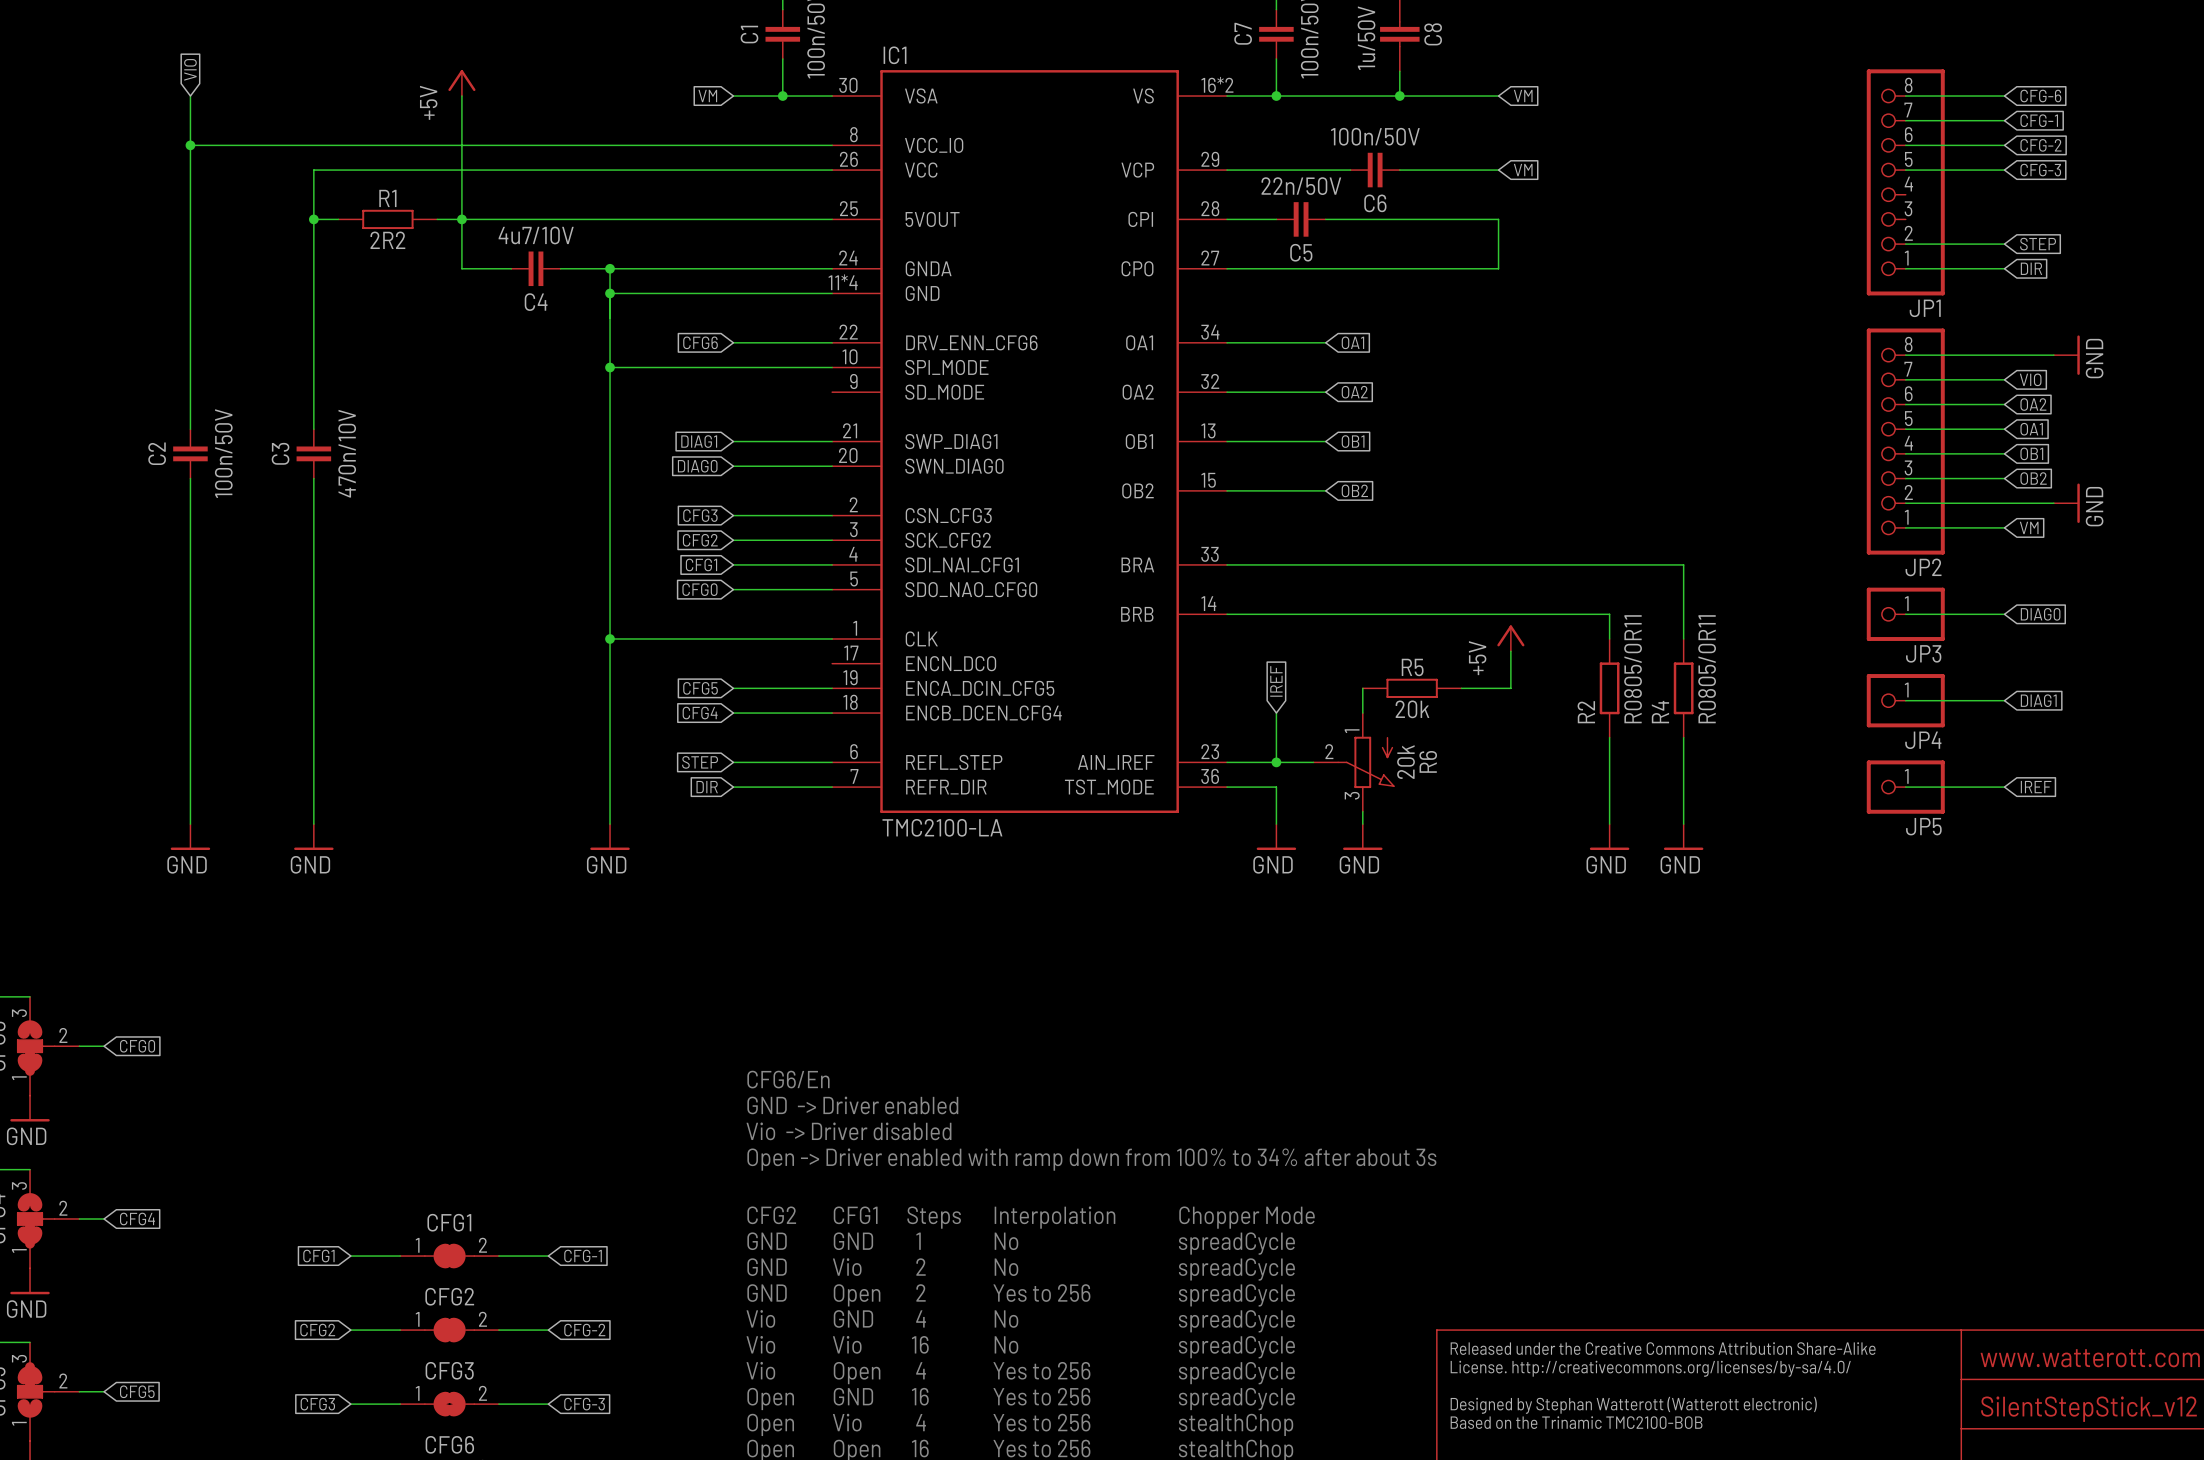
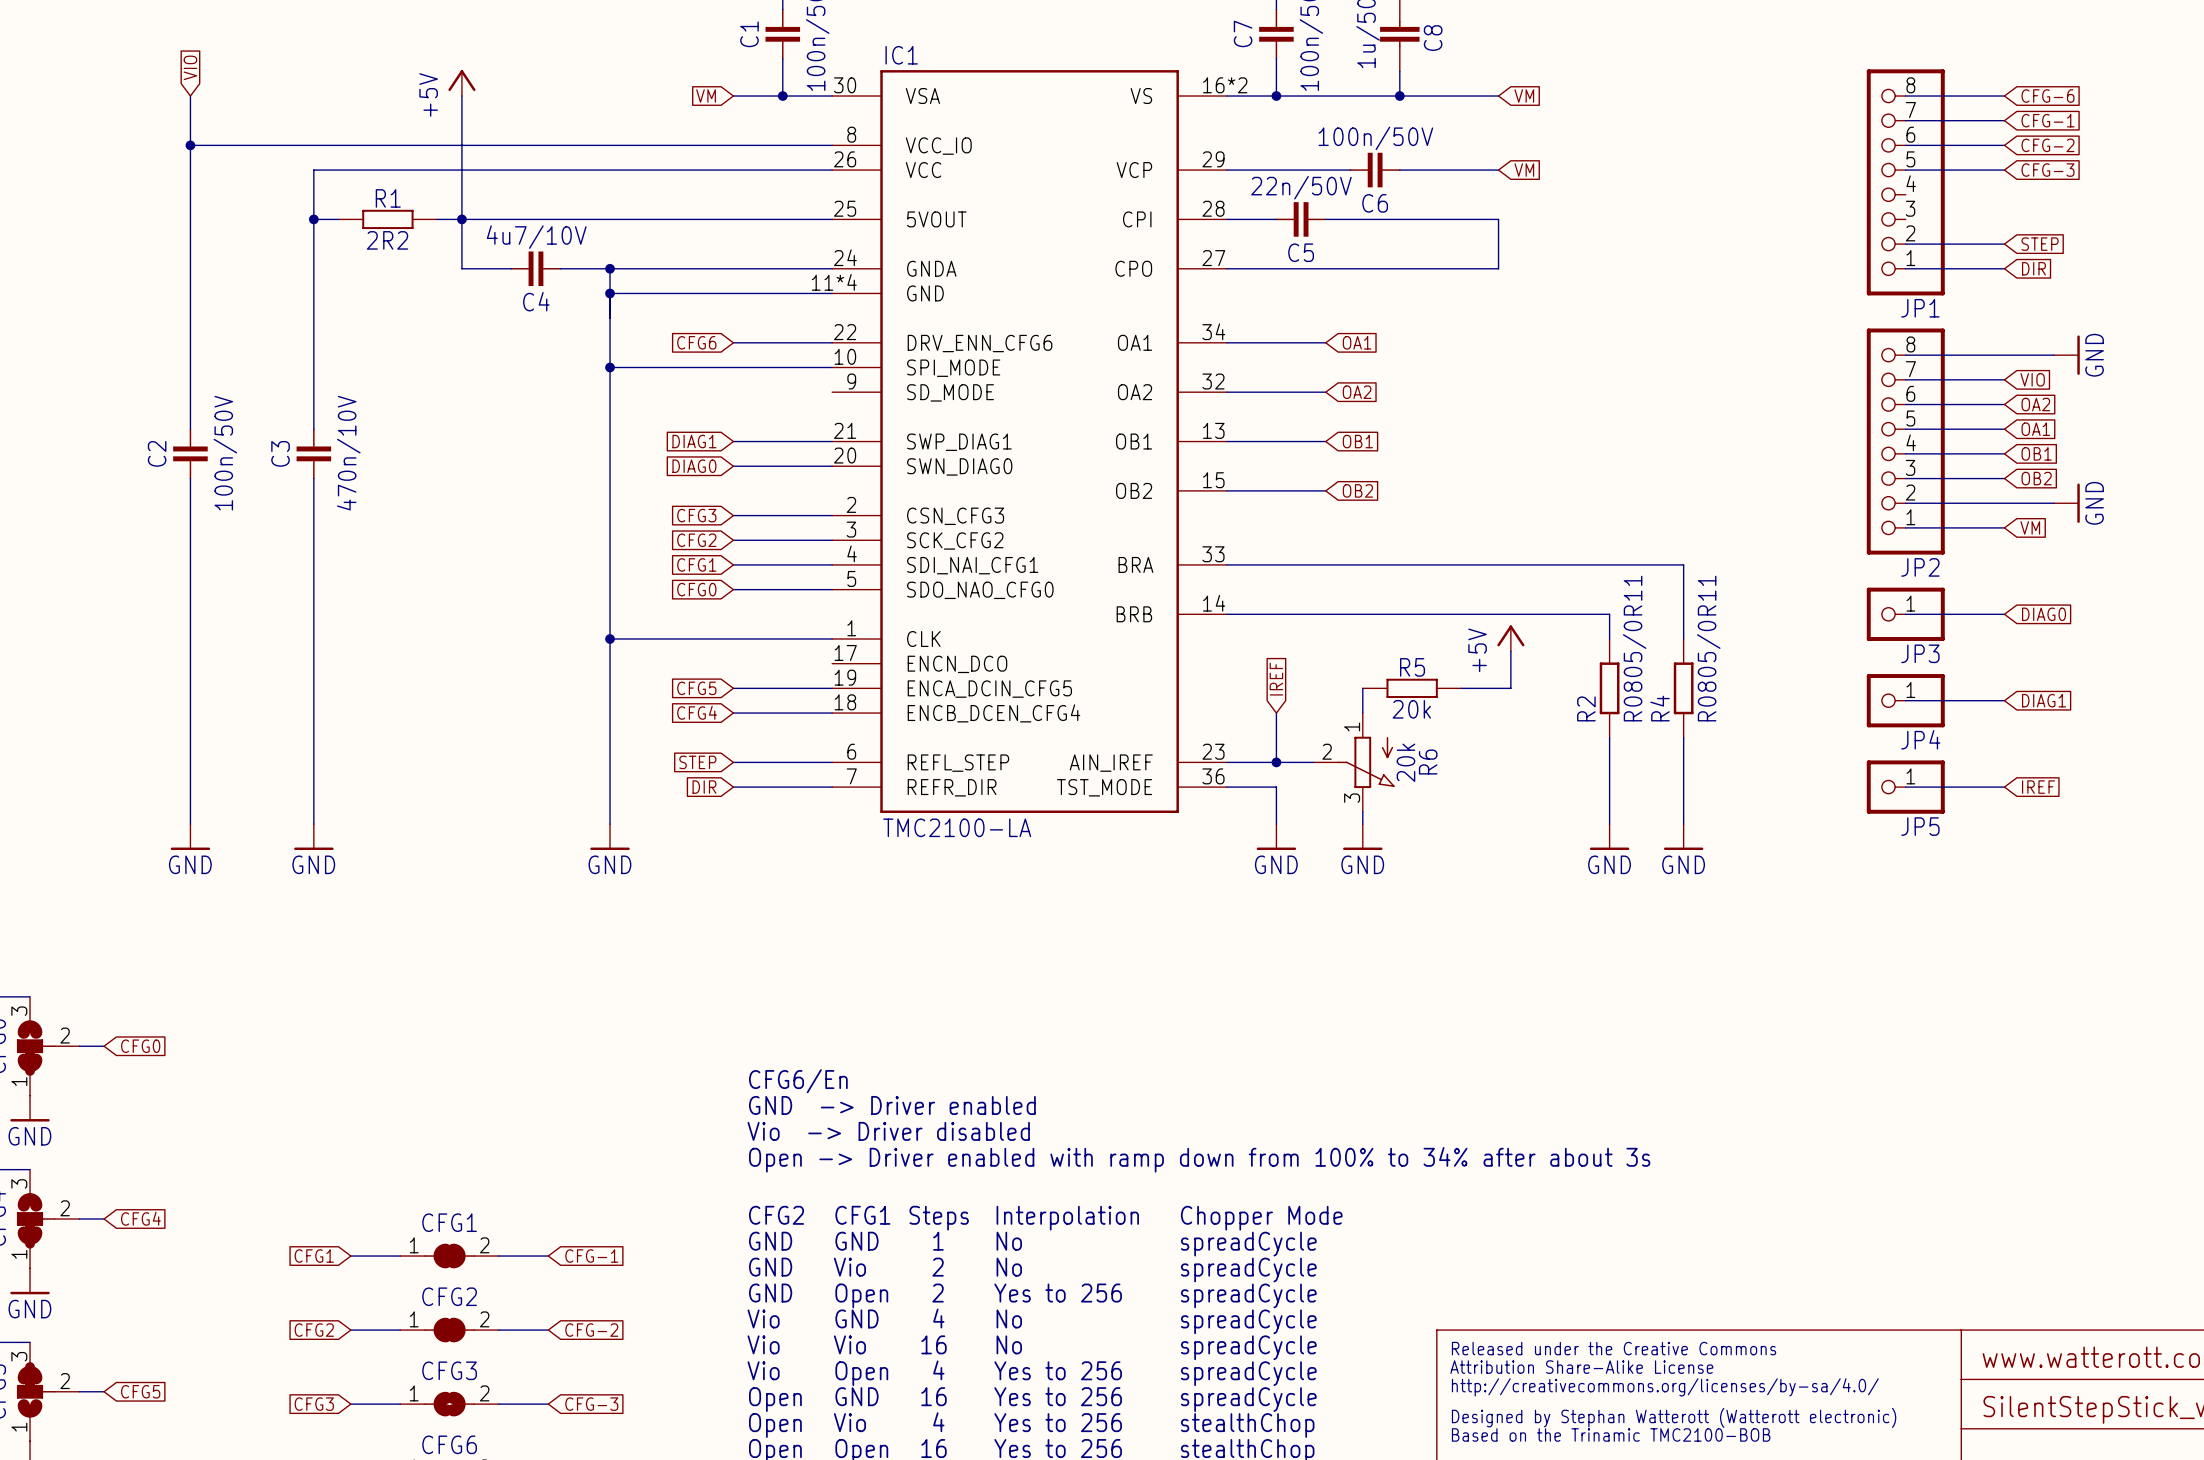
text: Released under the Creative Commons Attribution Share-Alike (1663, 1348) -> none
text: none -> Attribution Share-Alike License (1581, 1367)
text: License. http://creativecommons.org/licenses/by-sa/4.0/ (1650, 1368) -> Released under the Creative Commons (1614, 1348)
text: Designed by Stephan Watterott (Watterott electronic) (1633, 1405) -> http://creativecommons.org/licenses/by-sa/4.0/ (1665, 1387)
text: Based on the Trinamic TMC2100-BOB (1576, 1422) -> Designed by Stephan Watterott (Watterott electronic) (1674, 1417)
text: none -> Based on the Trinamic TMC2100-BOB (1611, 1434)

